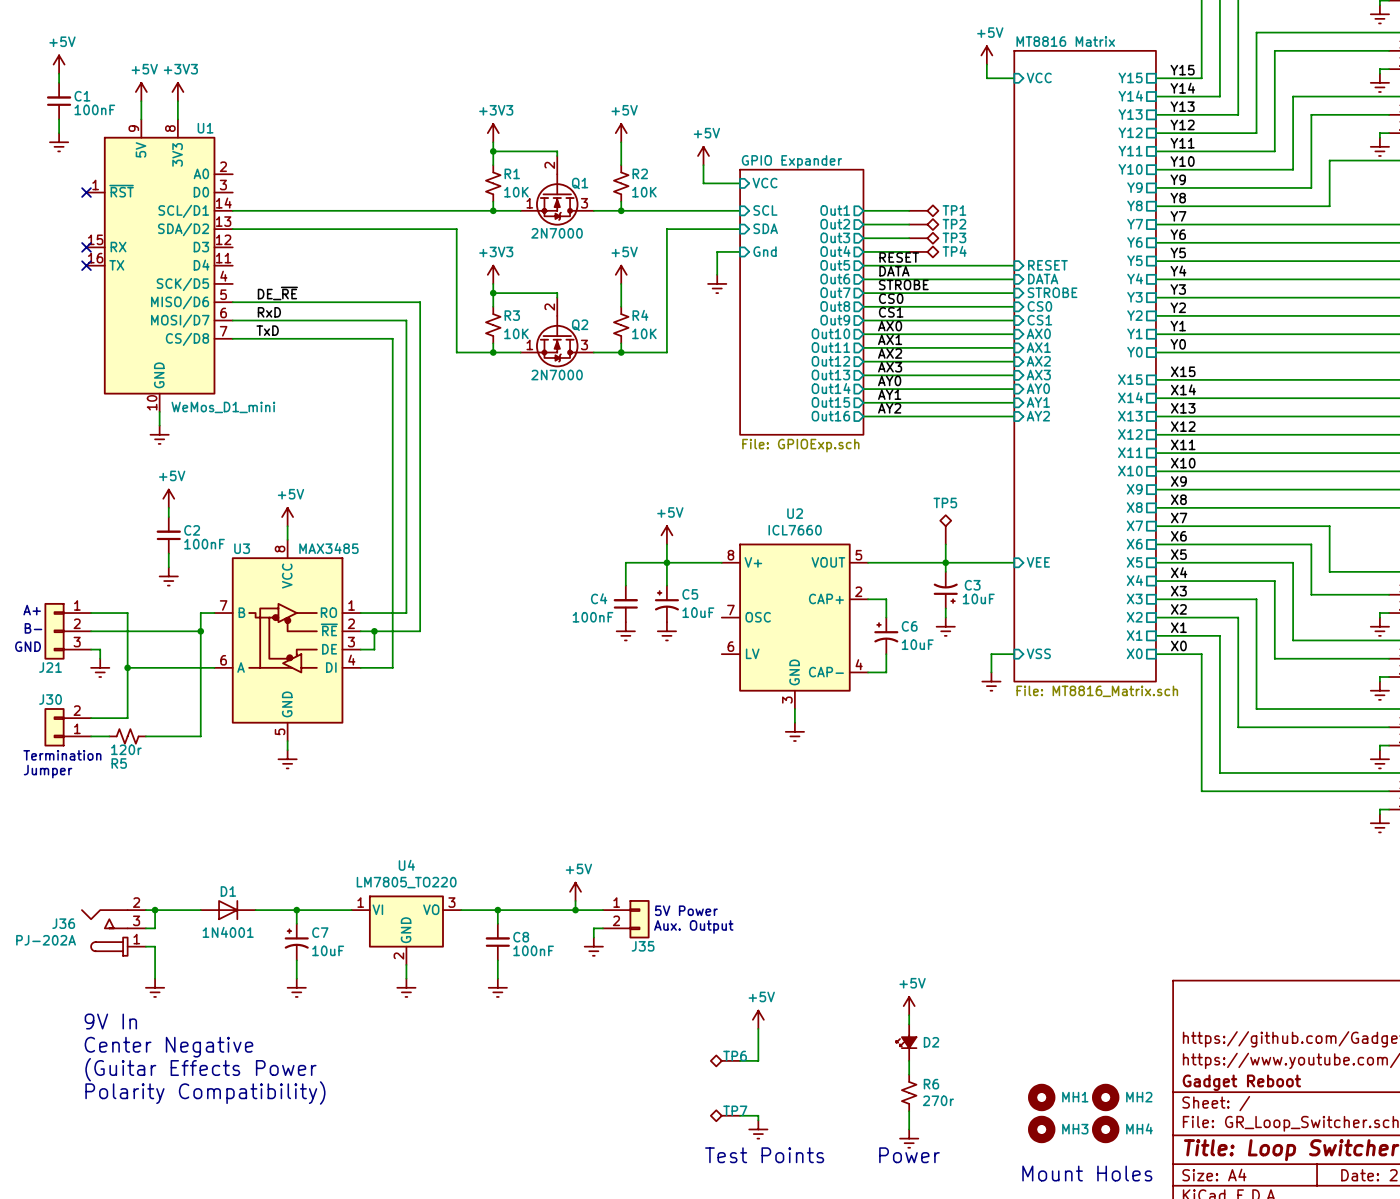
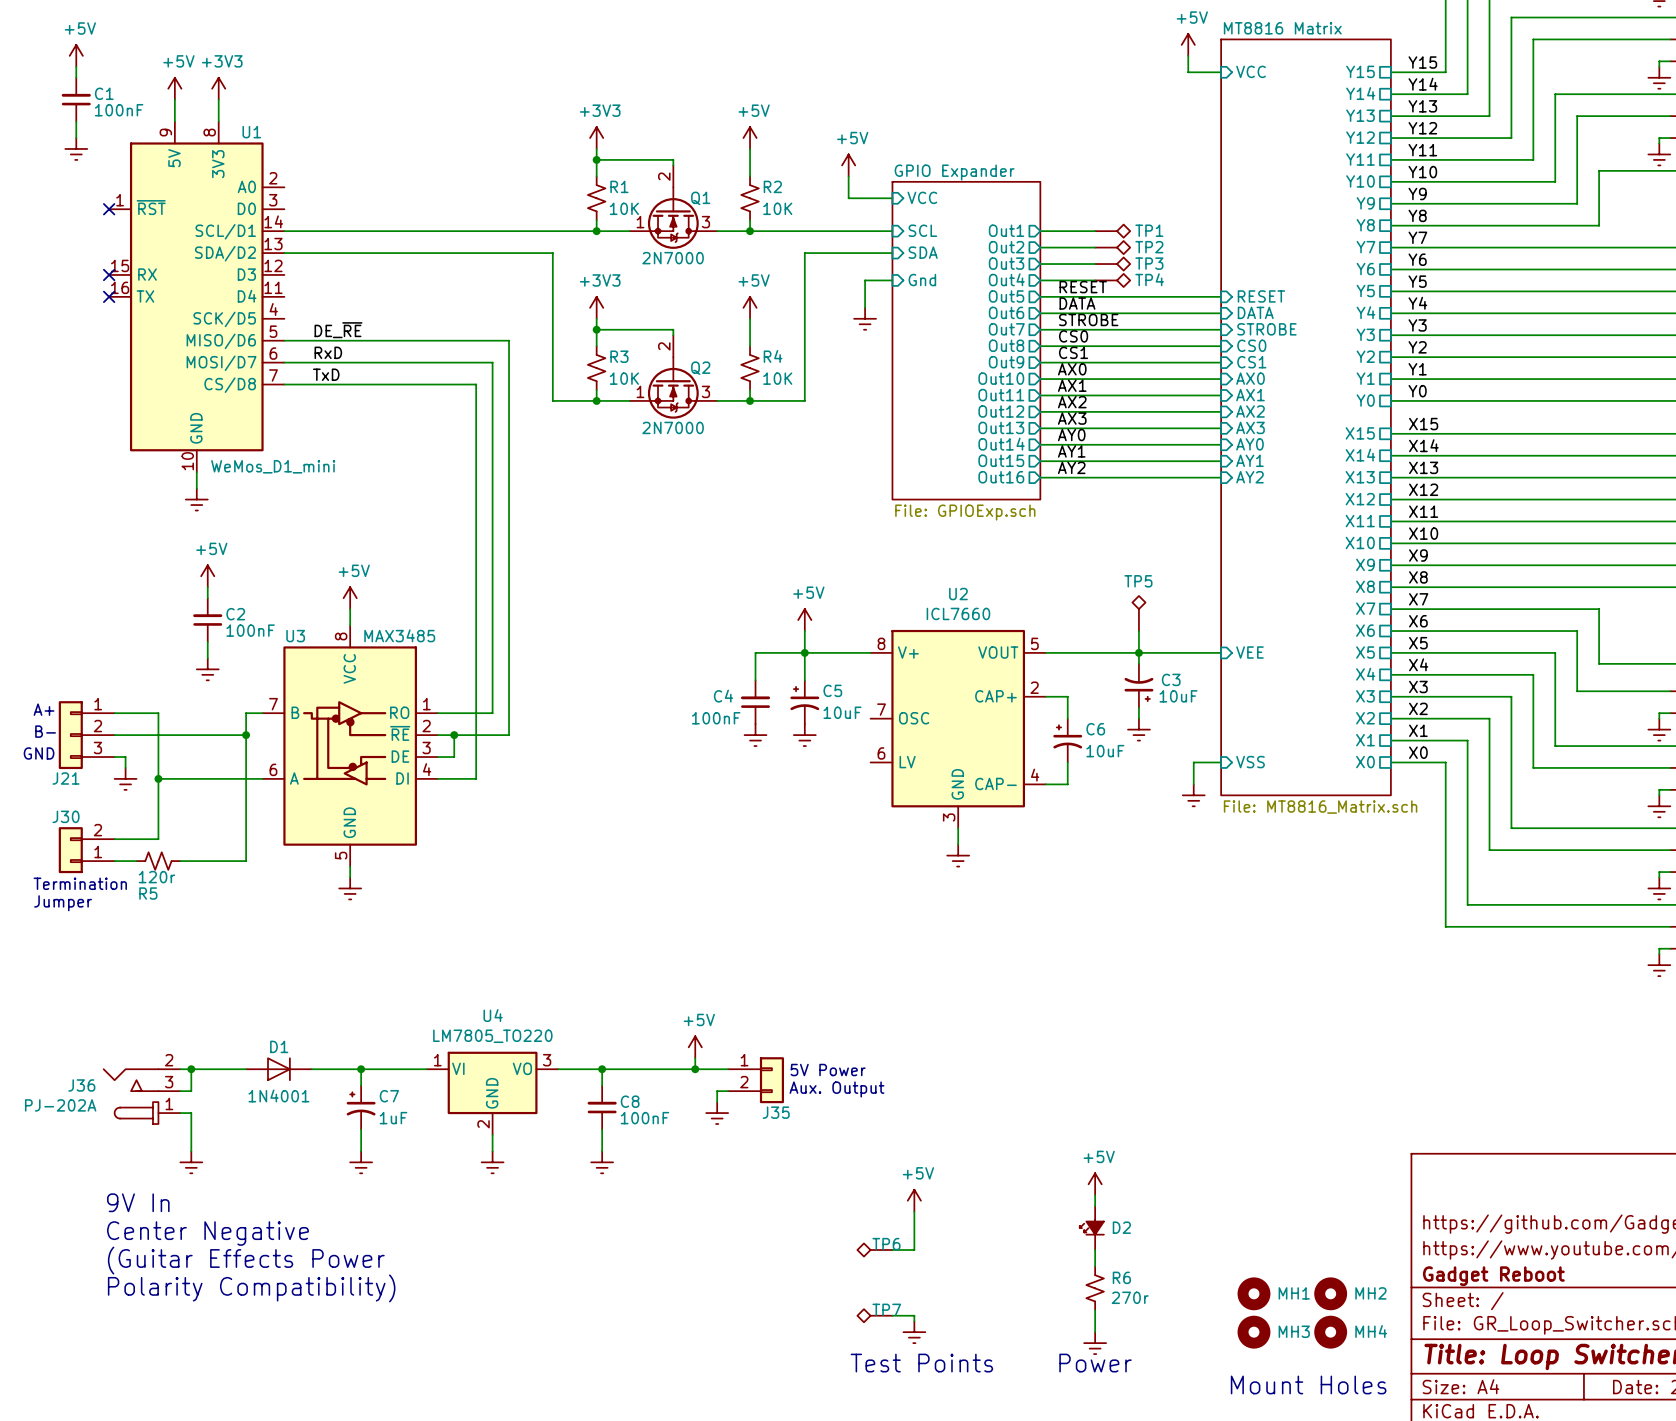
C7 value: 10uF (328, 950) -> 1uF (393, 1118)

